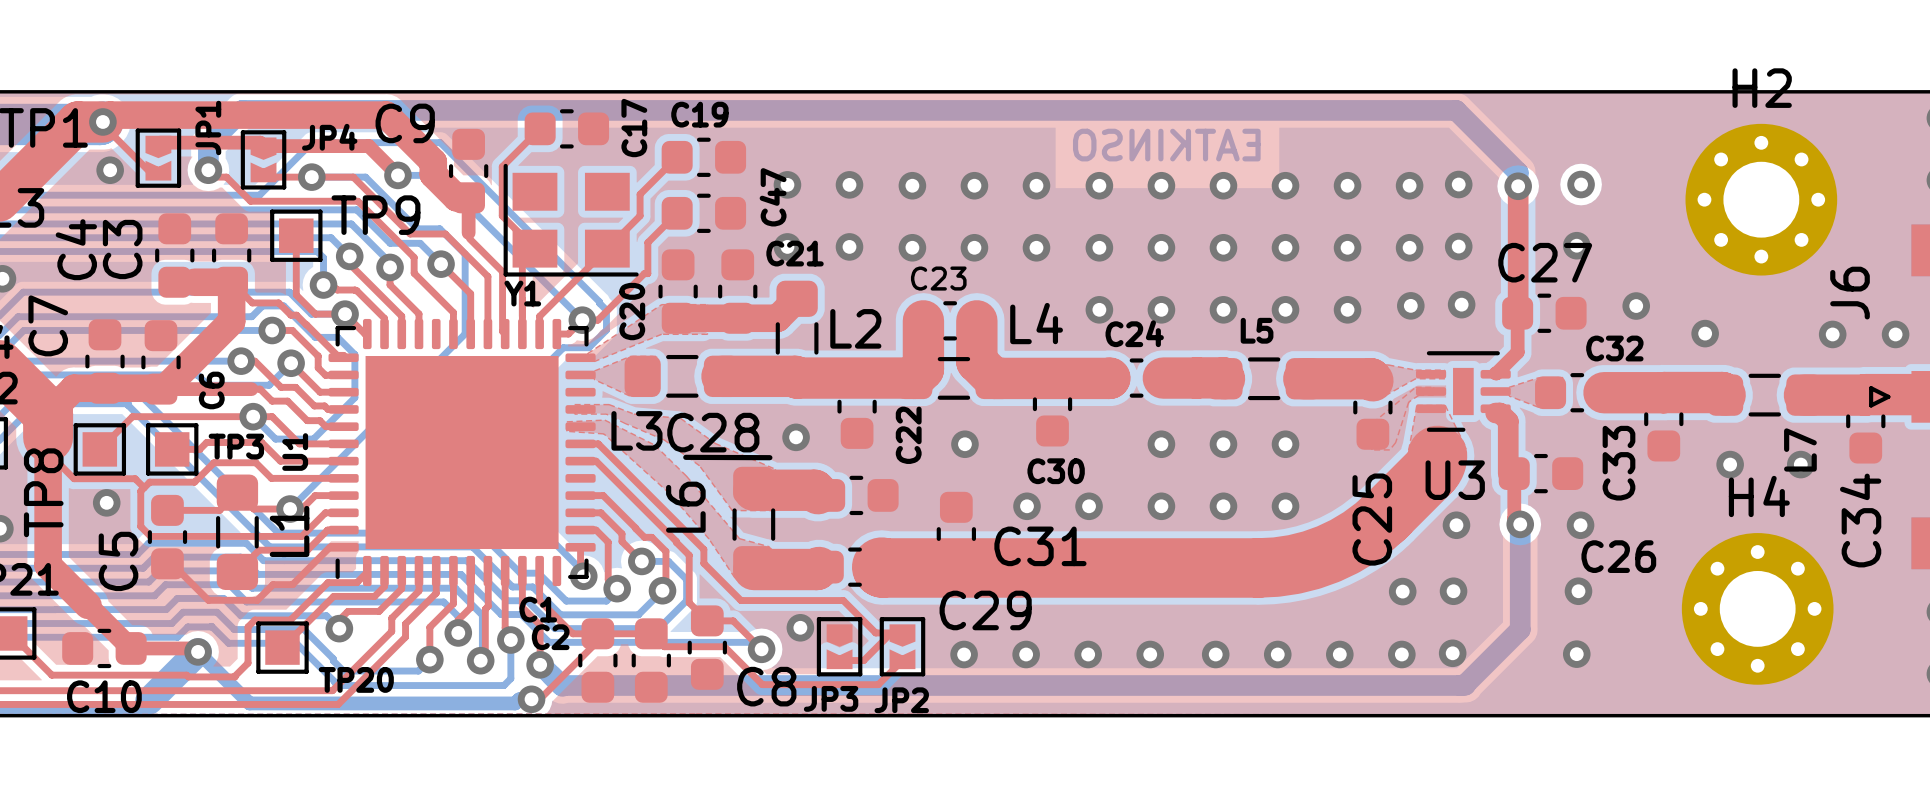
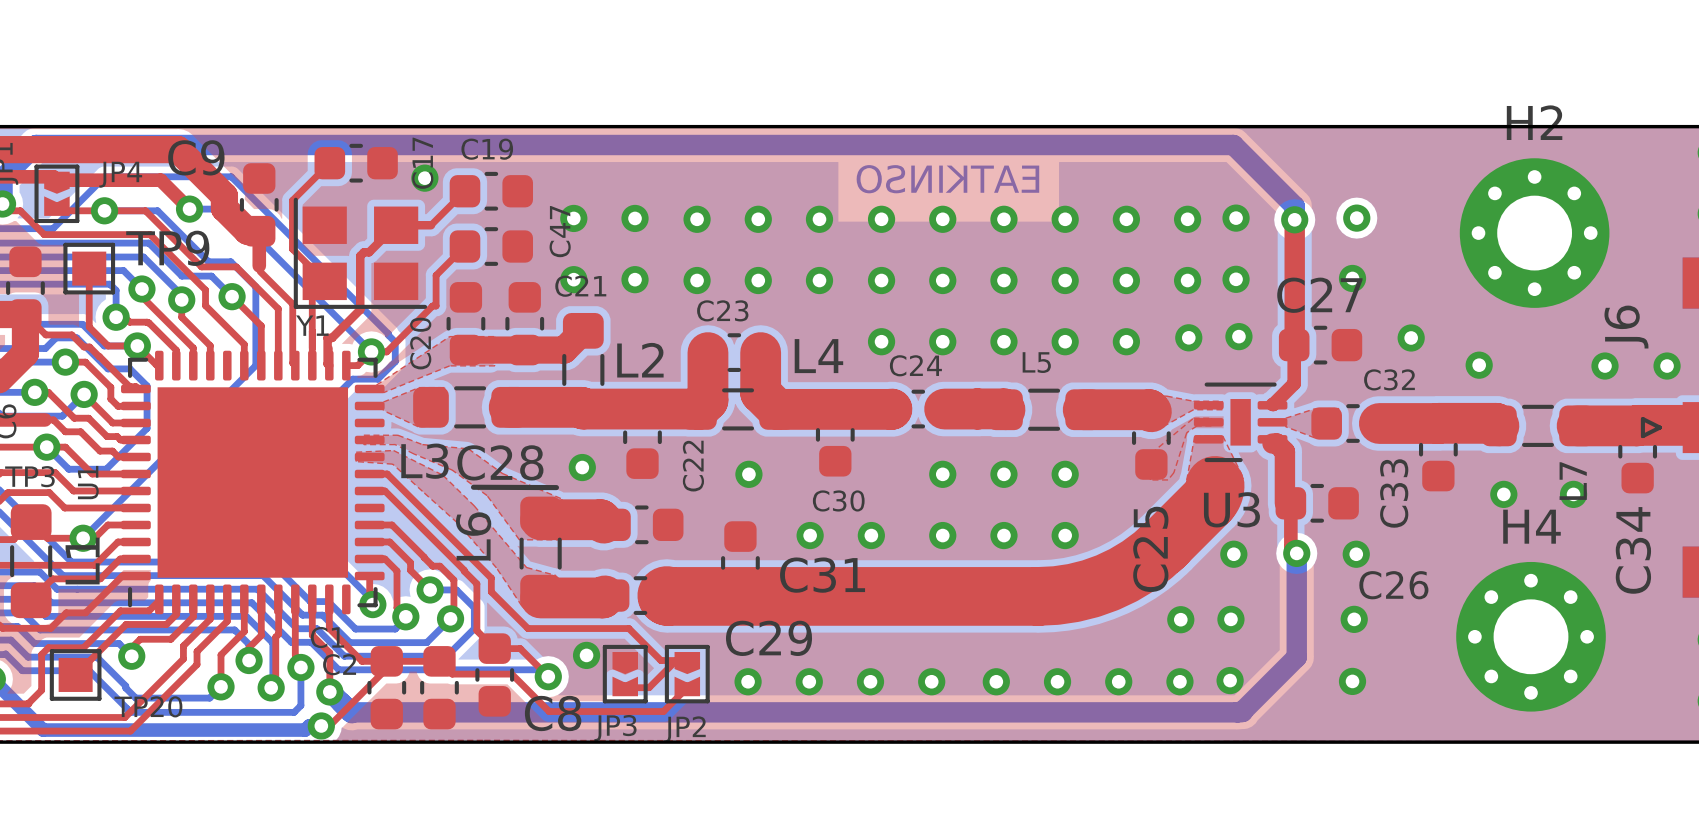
via: none -> (424, 178)
top track: (642, 191) (640, 194) (640, 215) (539, 316) -> (430, 225) (396, 225) (369, 252) (364, 252) (360, 256) (360, 309) (332, 337) (327, 337) (327, 363) (329, 365)

